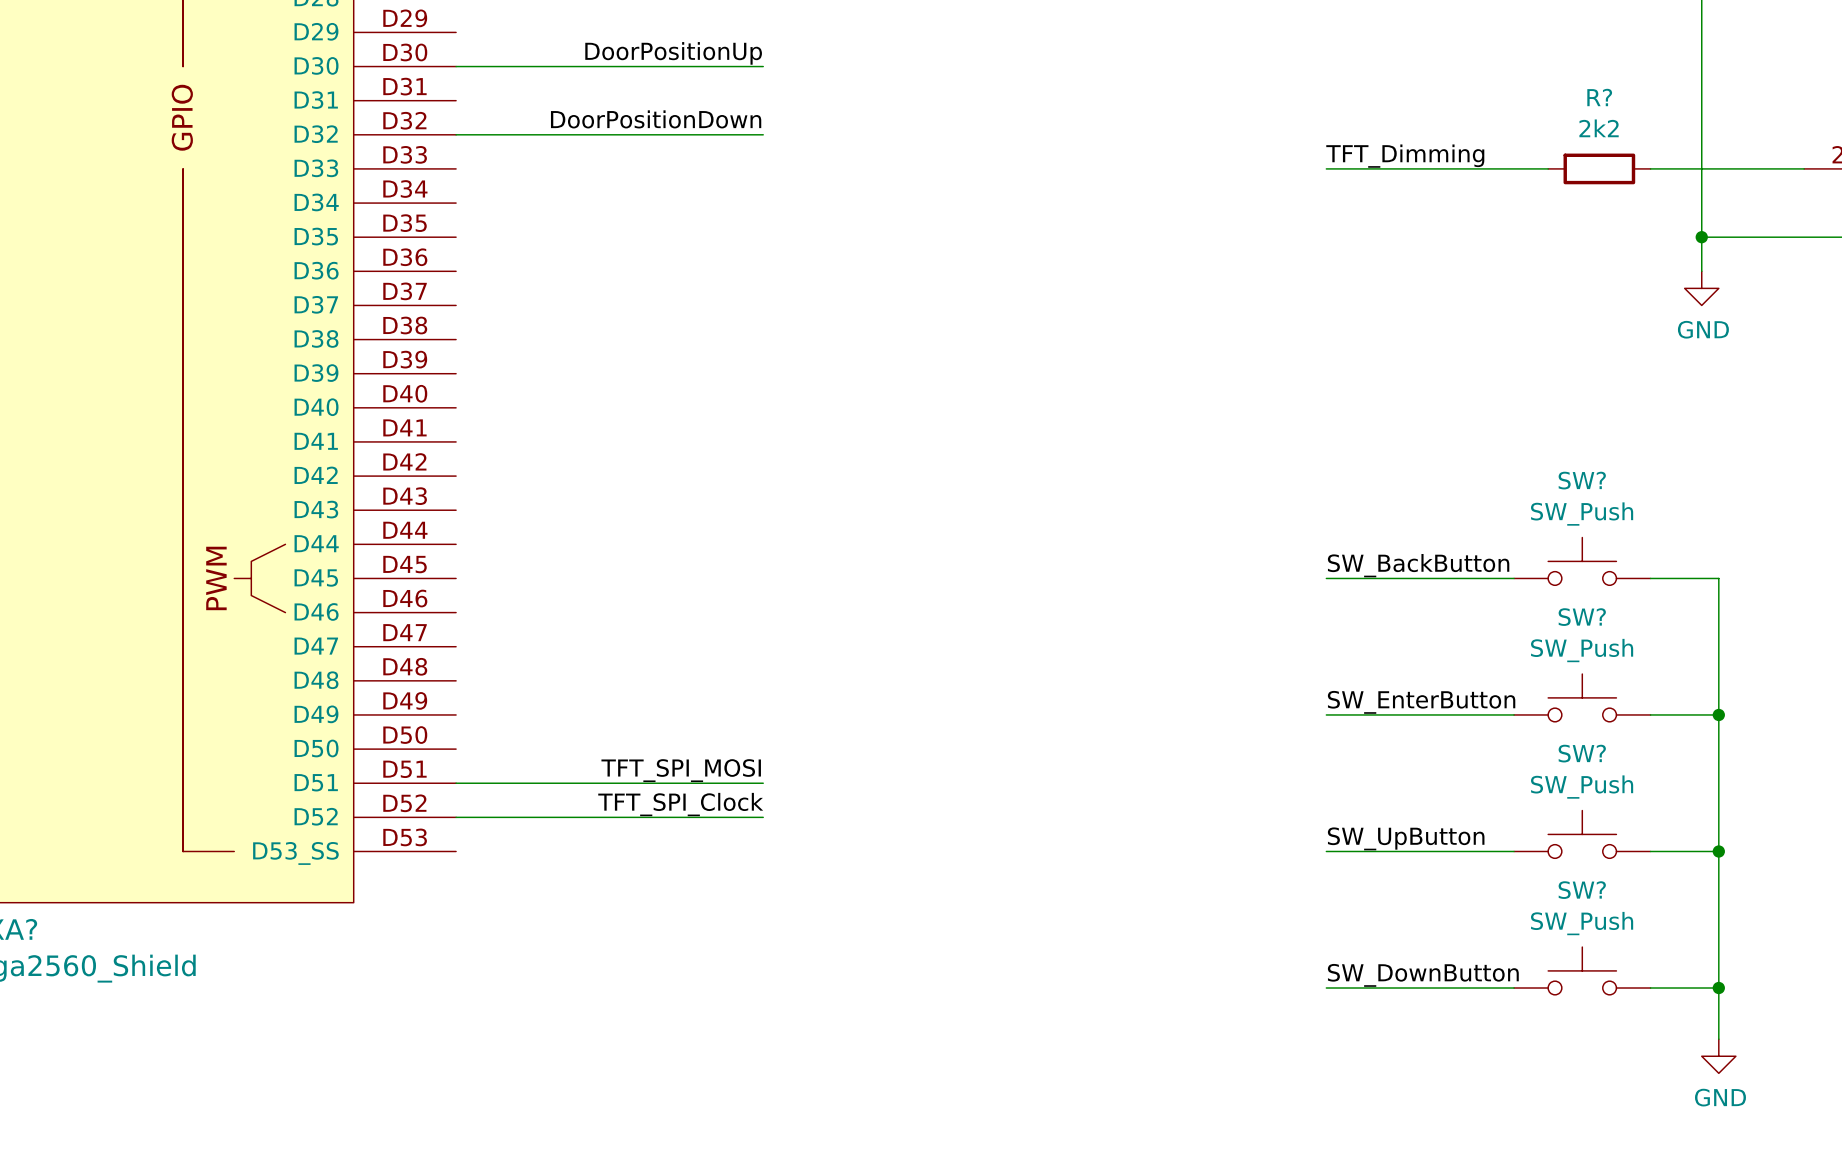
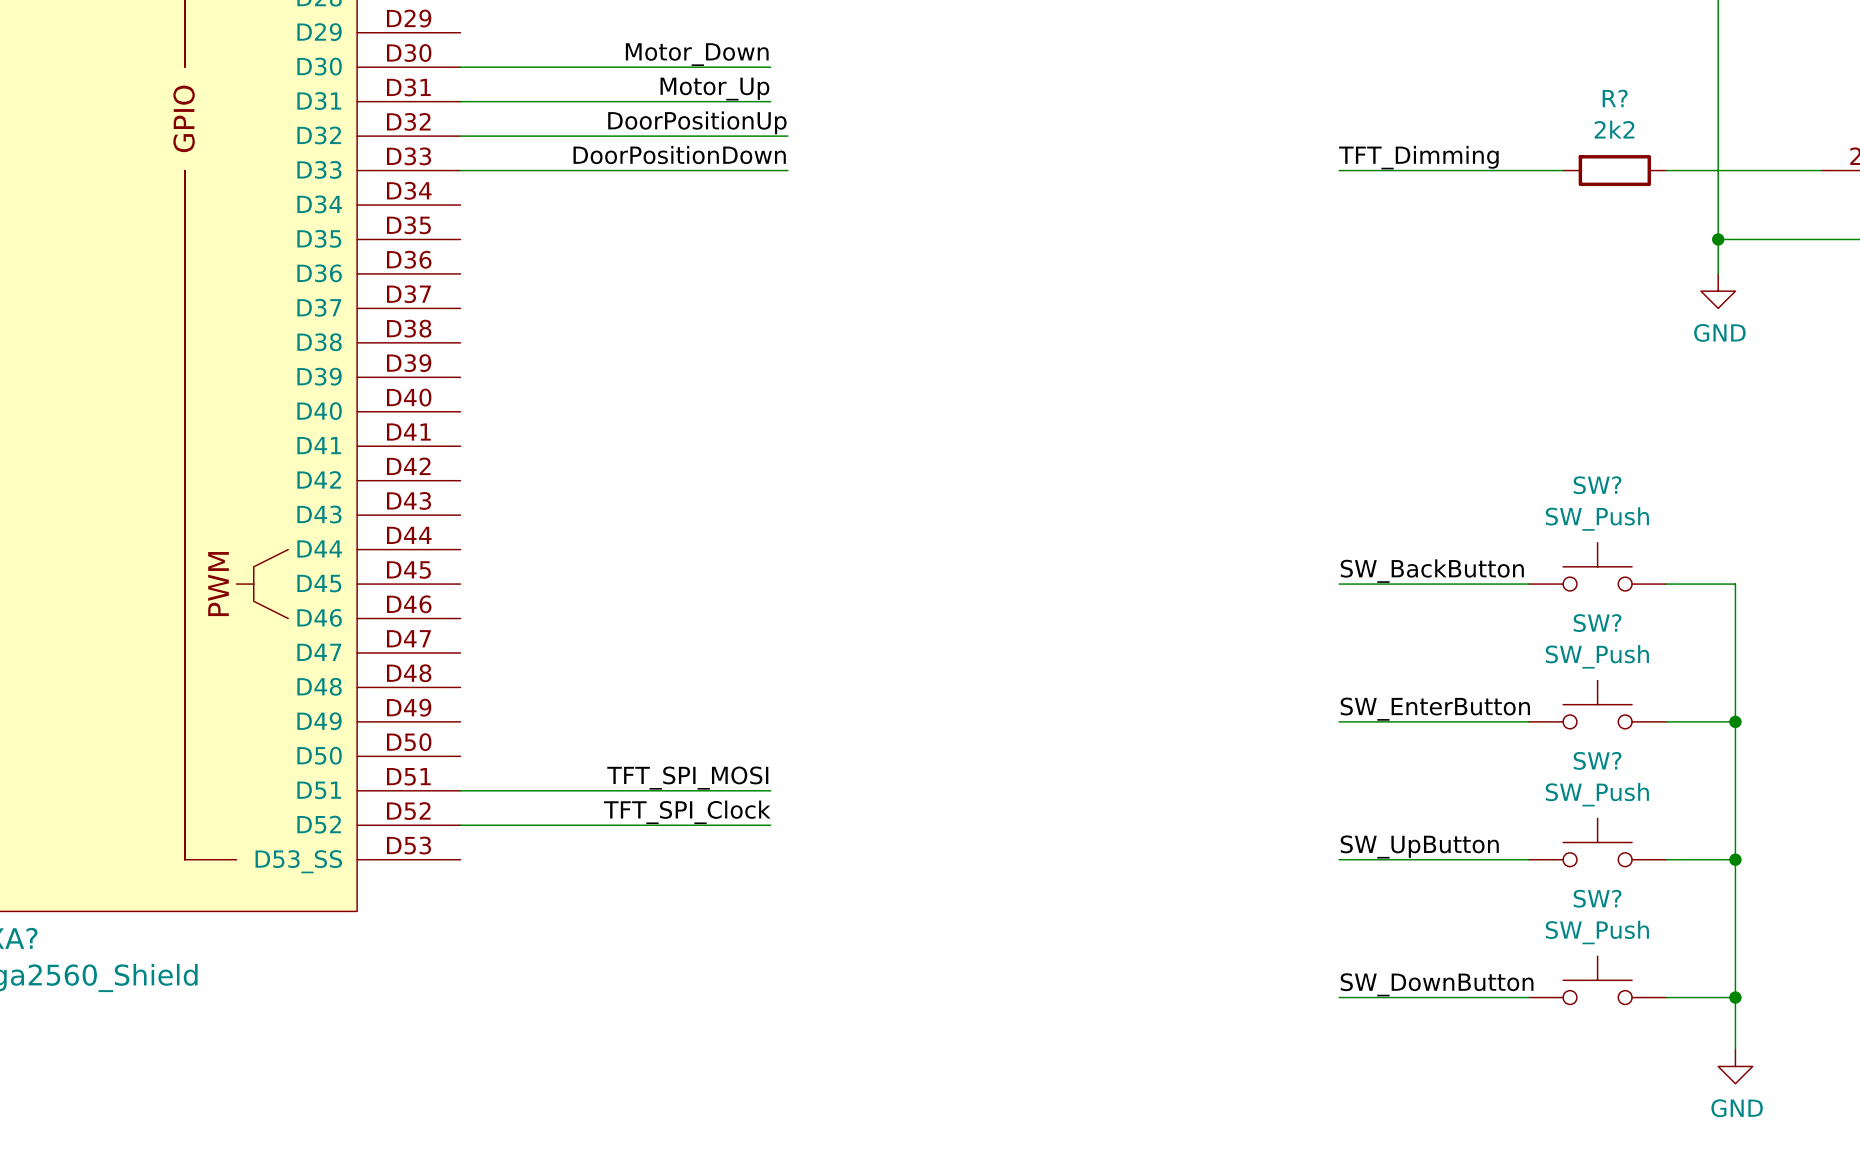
label: DoorPositionUp (673, 53) -> Motor_Down (697, 54)
label: none -> Motor_Up (714, 89)
wire: none -> (460, 101) (770, 101)
label position: DoorPositionDown (656, 119) -> DoorPositionDown (679, 155)
label: none -> DoorPositionUp (697, 122)
wire: none -> (770, 136) (787, 136)
wire: none -> (460, 170) (787, 170)

